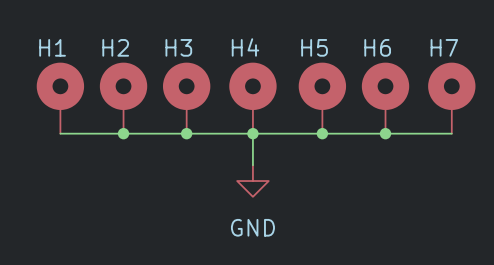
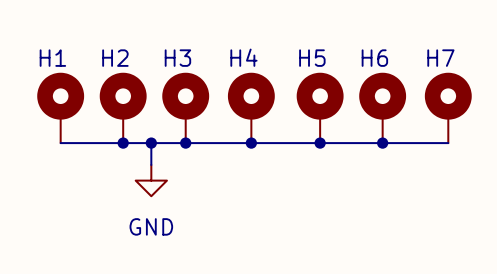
wire: none -> (151, 143) (151, 164)
junction: none -> (151, 143)
wire: (252, 133) (252, 165) -> none
power symbol position: GND (252, 181) -> GND (151, 180)

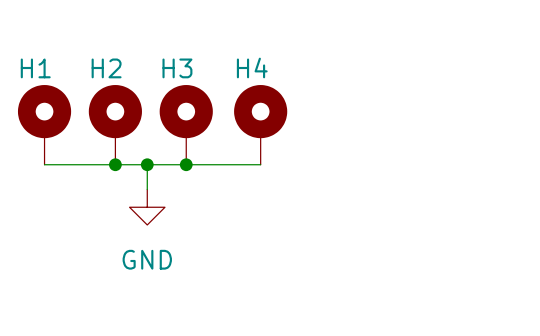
H5: (320, 107) -> none
H6: (382, 107) -> none
H7: (448, 107) -> none
wire: (251, 143) (448, 143) -> none
junction: (251, 143) -> none
junction: (320, 143) -> none
junction: (382, 143) -> none

